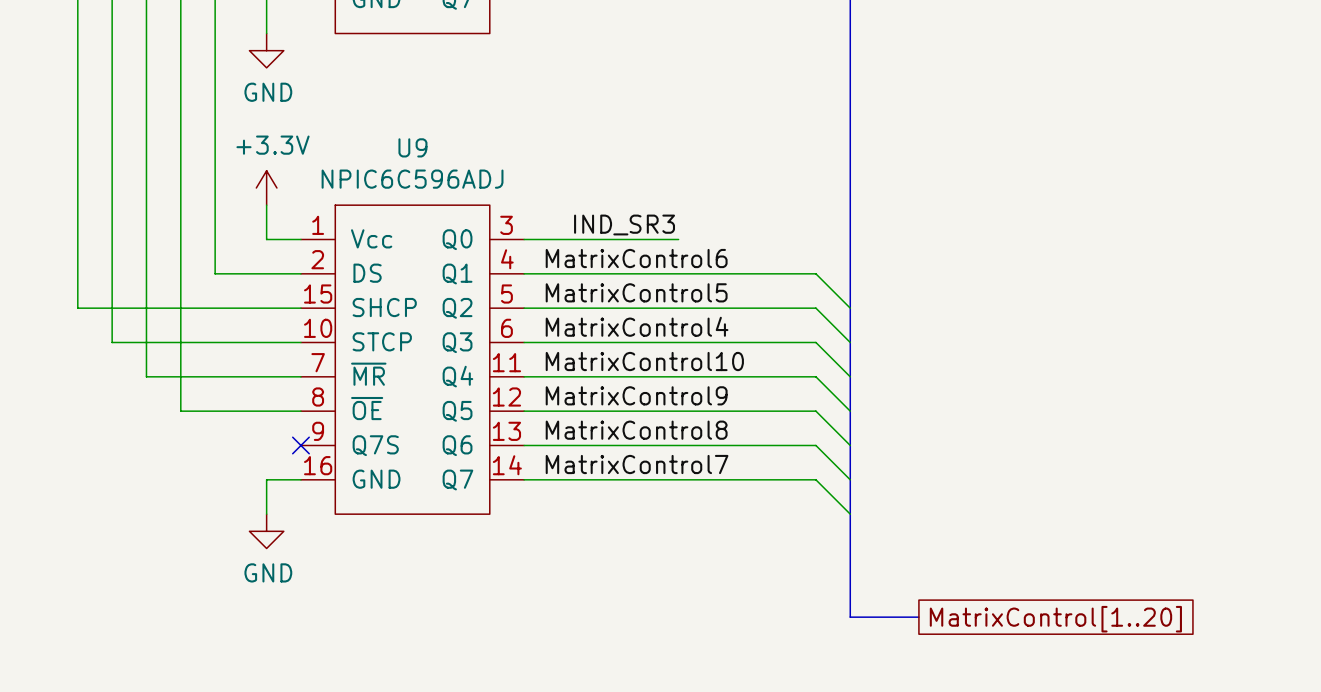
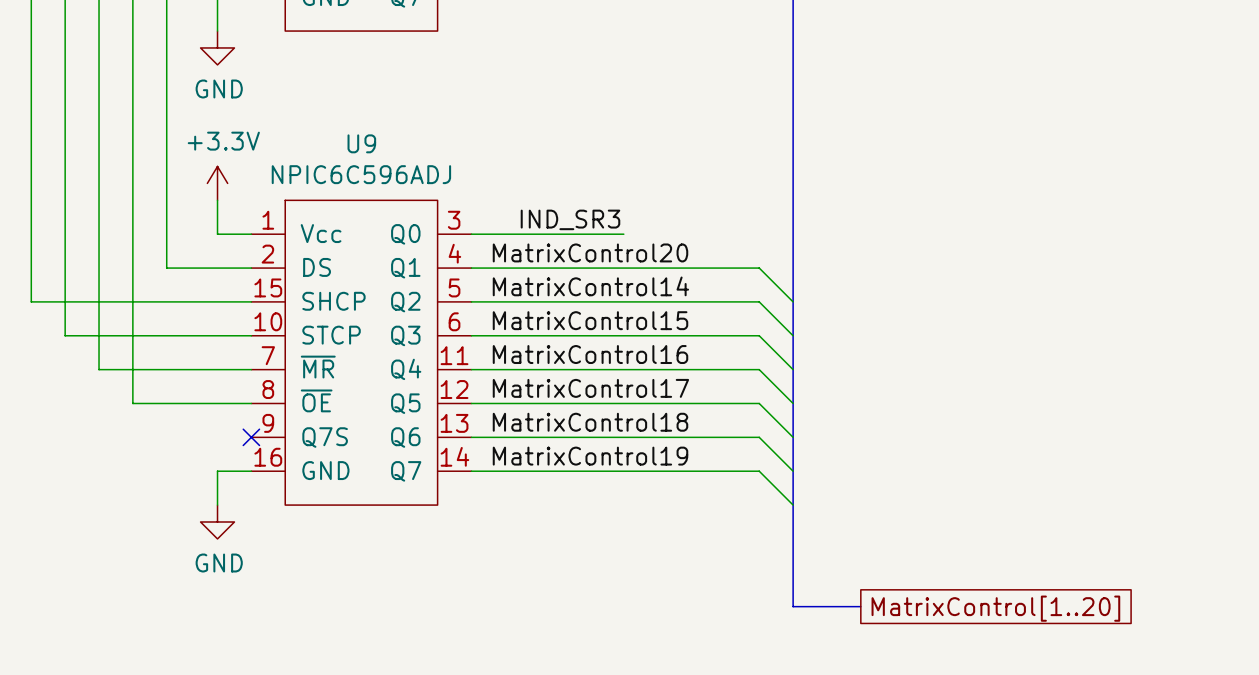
label: MatrixControl6 (636, 258) -> MatrixControl20 (590, 252)
label: MatrixControl5 (636, 292) -> MatrixControl14 (590, 286)
label: MatrixControl4 (637, 326) -> MatrixControl15 (590, 320)
label: MatrixControl10 (644, 361) -> MatrixControl16 (590, 354)
label: MatrixControl9 (636, 395) -> MatrixControl17 (590, 388)
label: MatrixControl8 (636, 430) -> MatrixControl18 (590, 422)
label: MatrixControl7 (637, 464) -> MatrixControl19 (590, 456)

